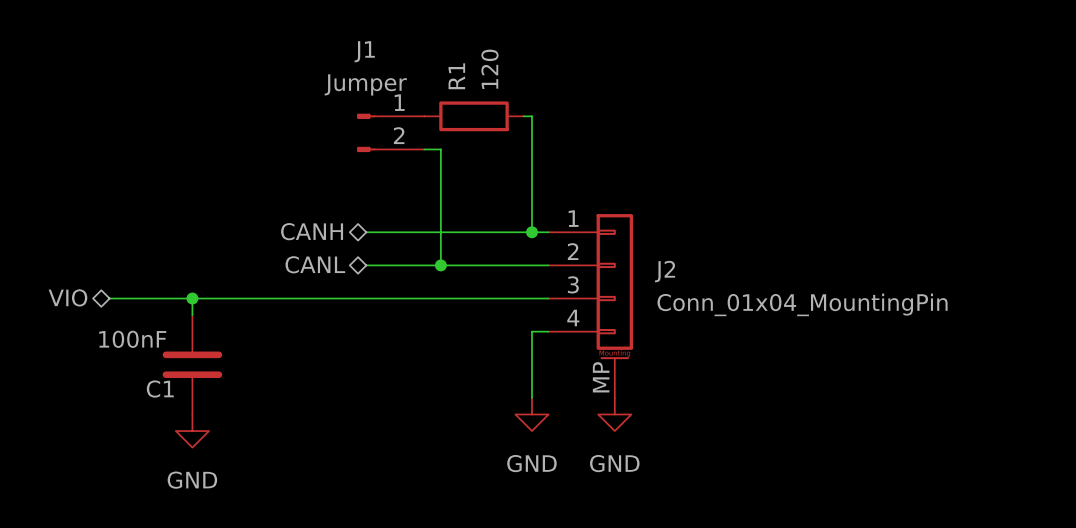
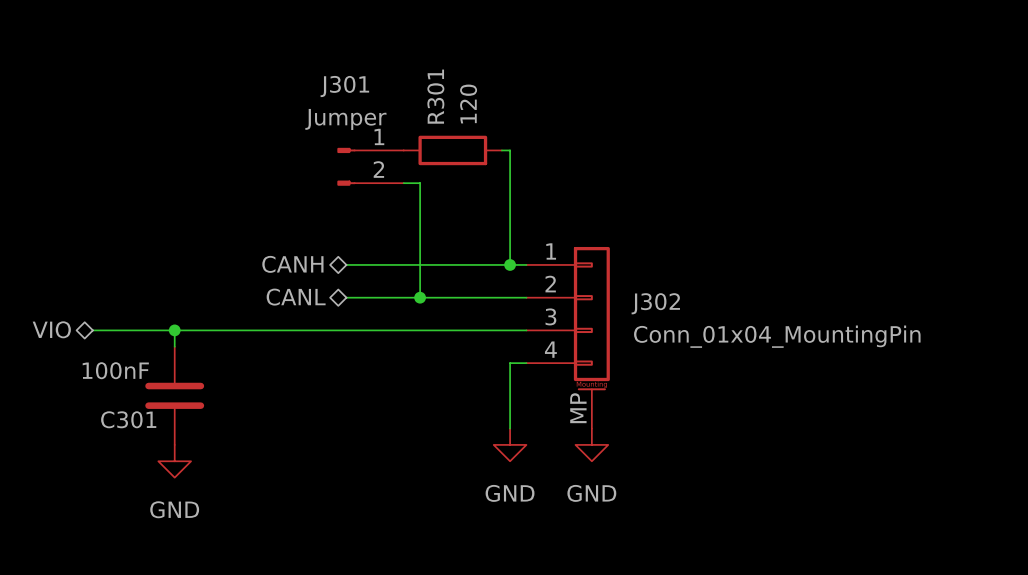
J1 name: J1 (364, 51) -> J301 (344, 86)
R1 name: R1 (456, 76) -> R301 (435, 96)
J2 name: J2 (665, 271) -> J302 (655, 303)
C1 name: C1 (160, 389) -> C301 (128, 419)

